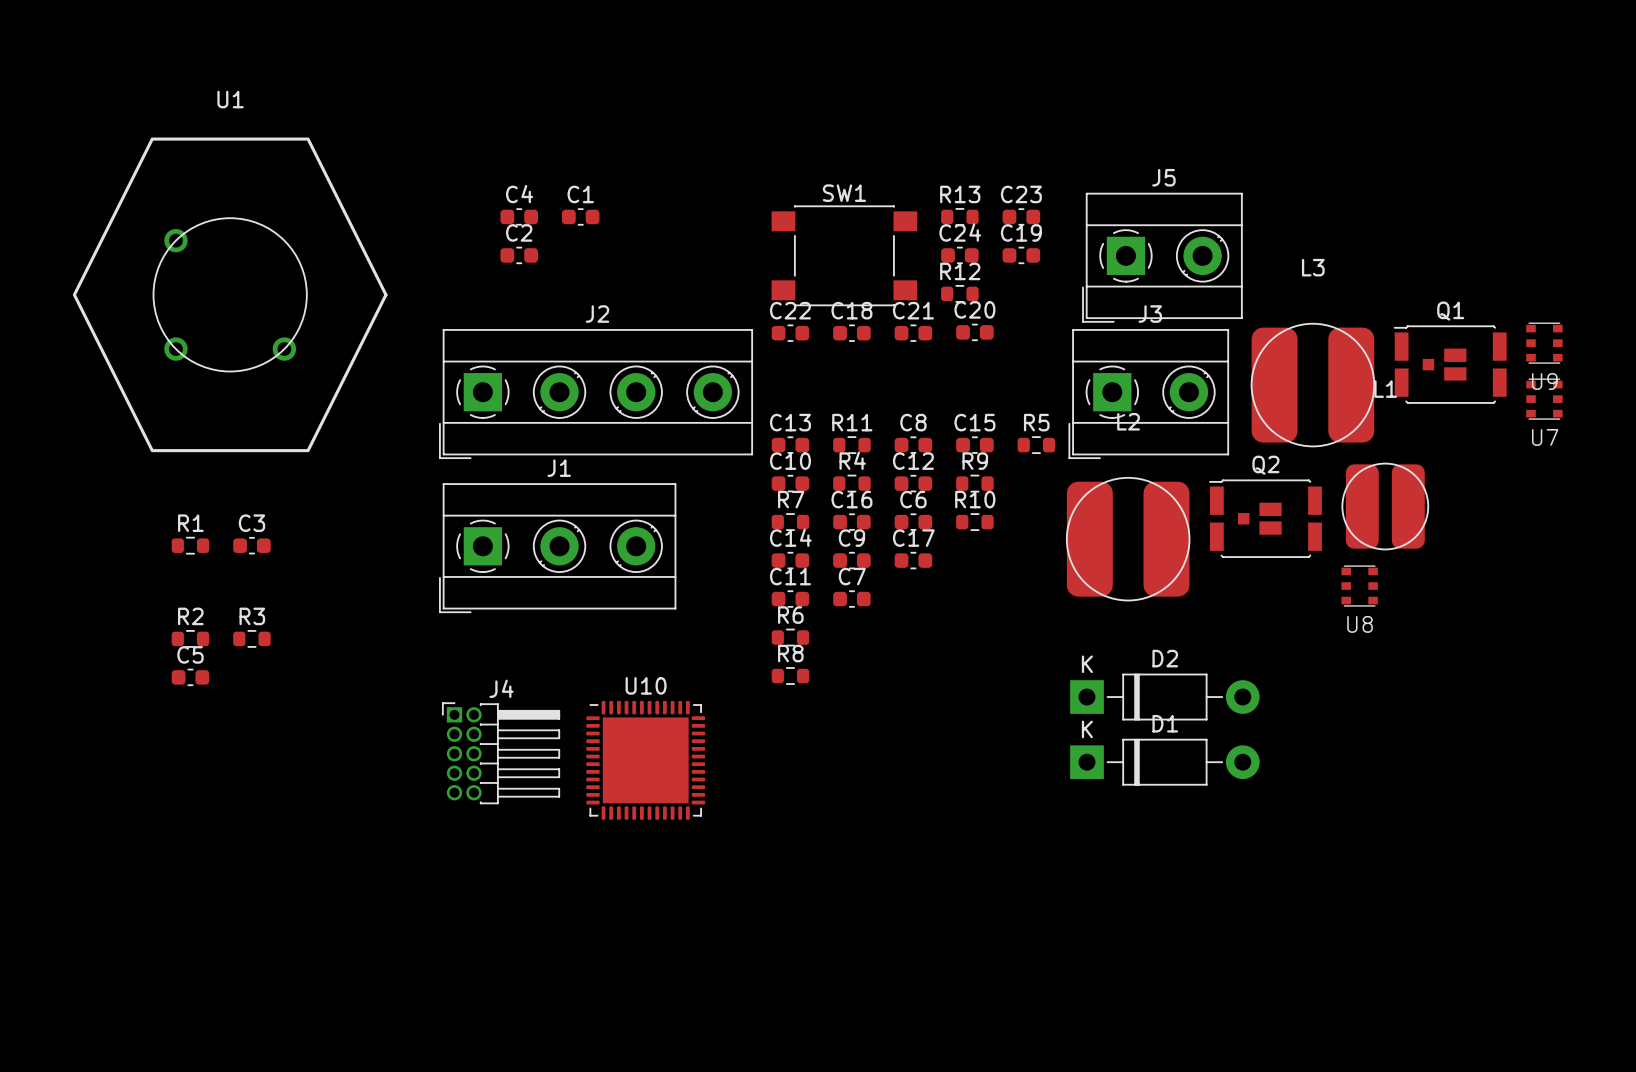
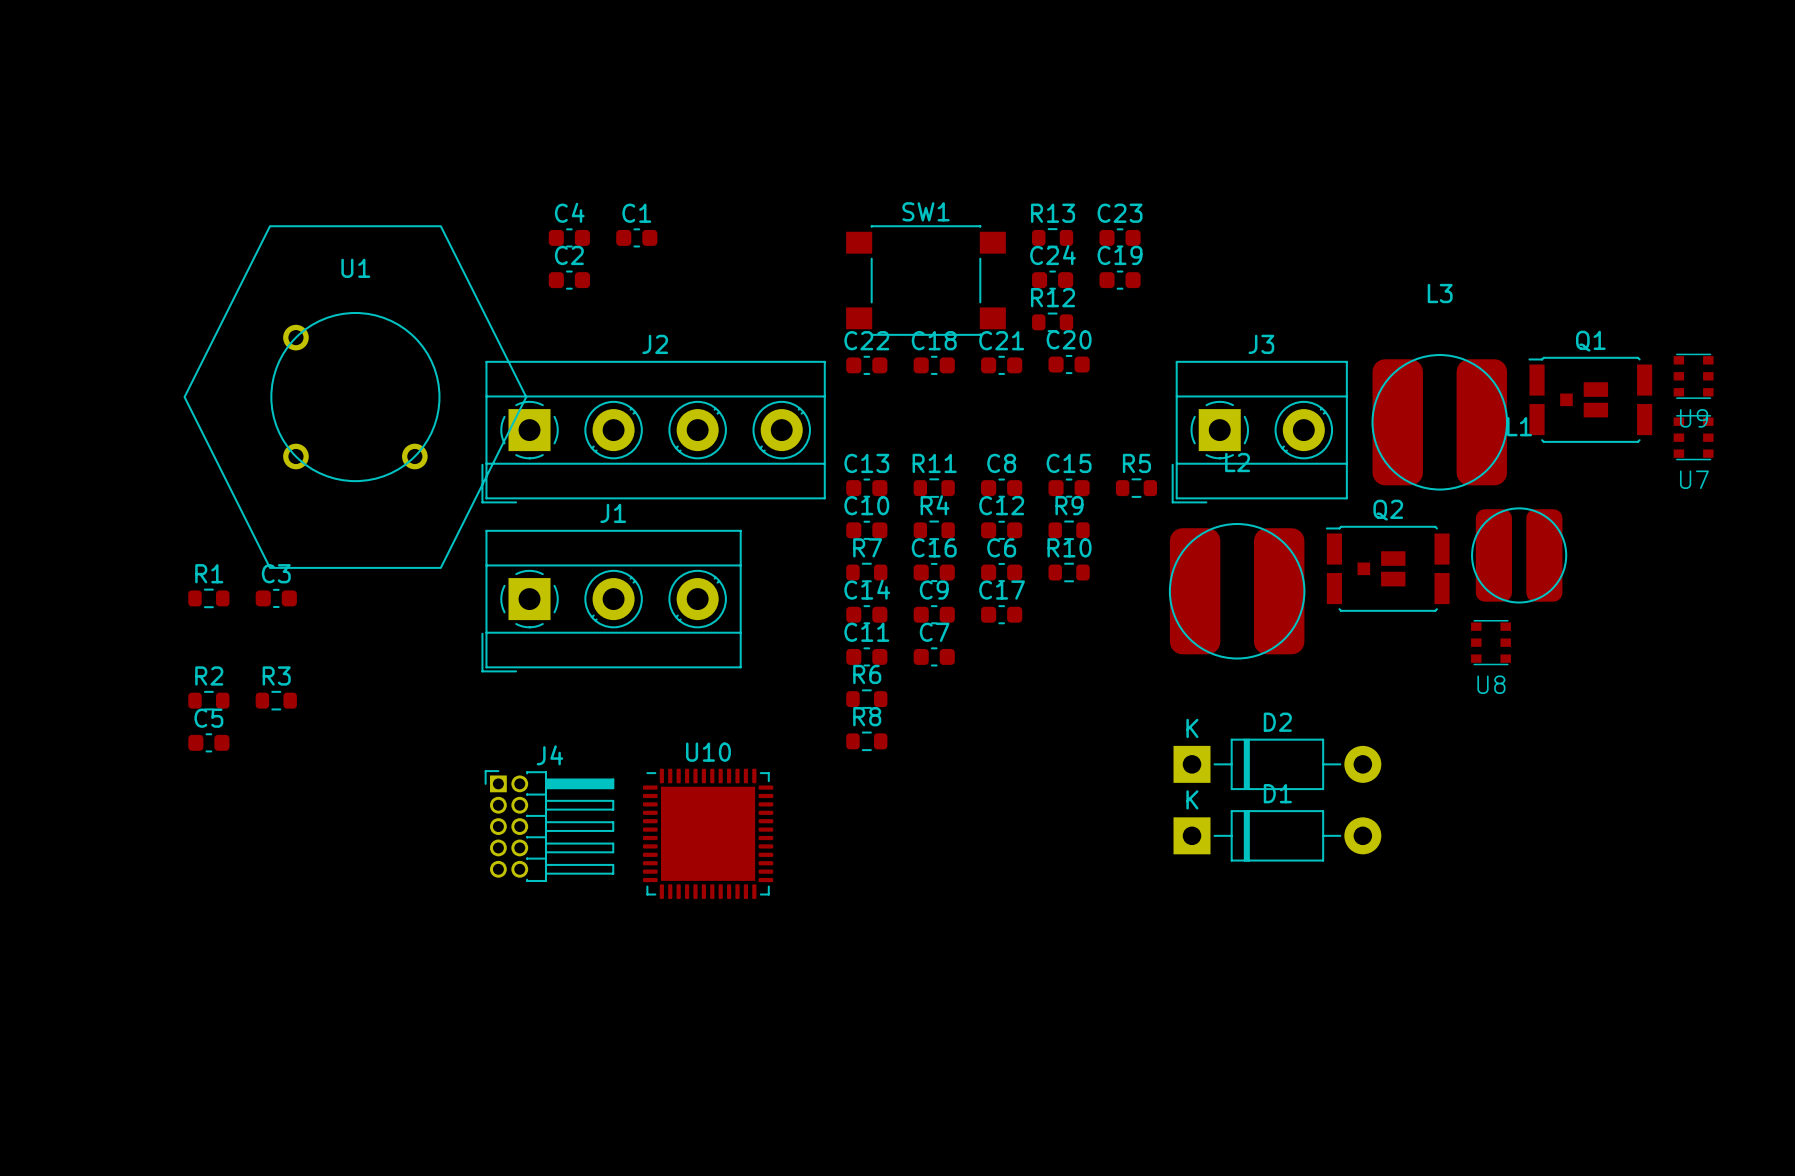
U1 name position: U1 (230, 99) -> U1 (355, 268)
U1 footprint: [72, 137, 388, 453] -> [183, 225, 528, 569]
J5: (1162, 257) -> none

